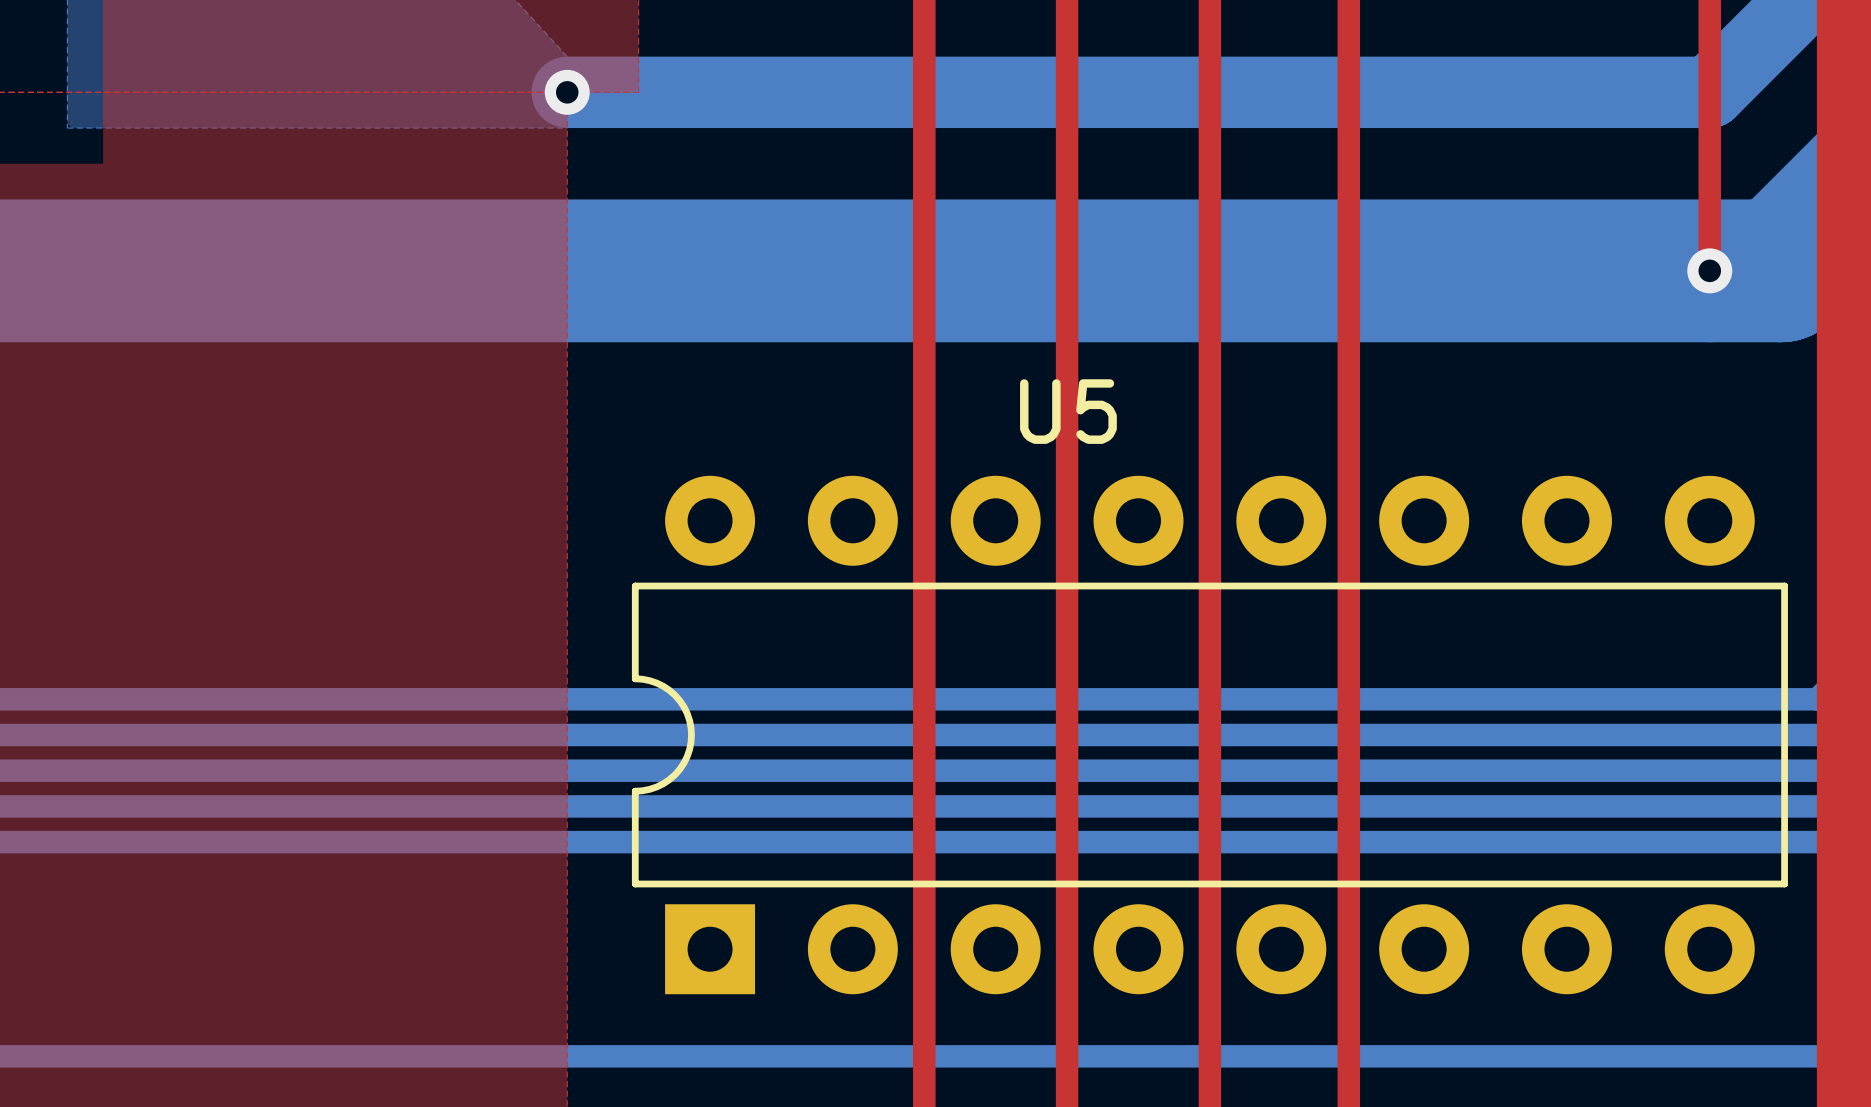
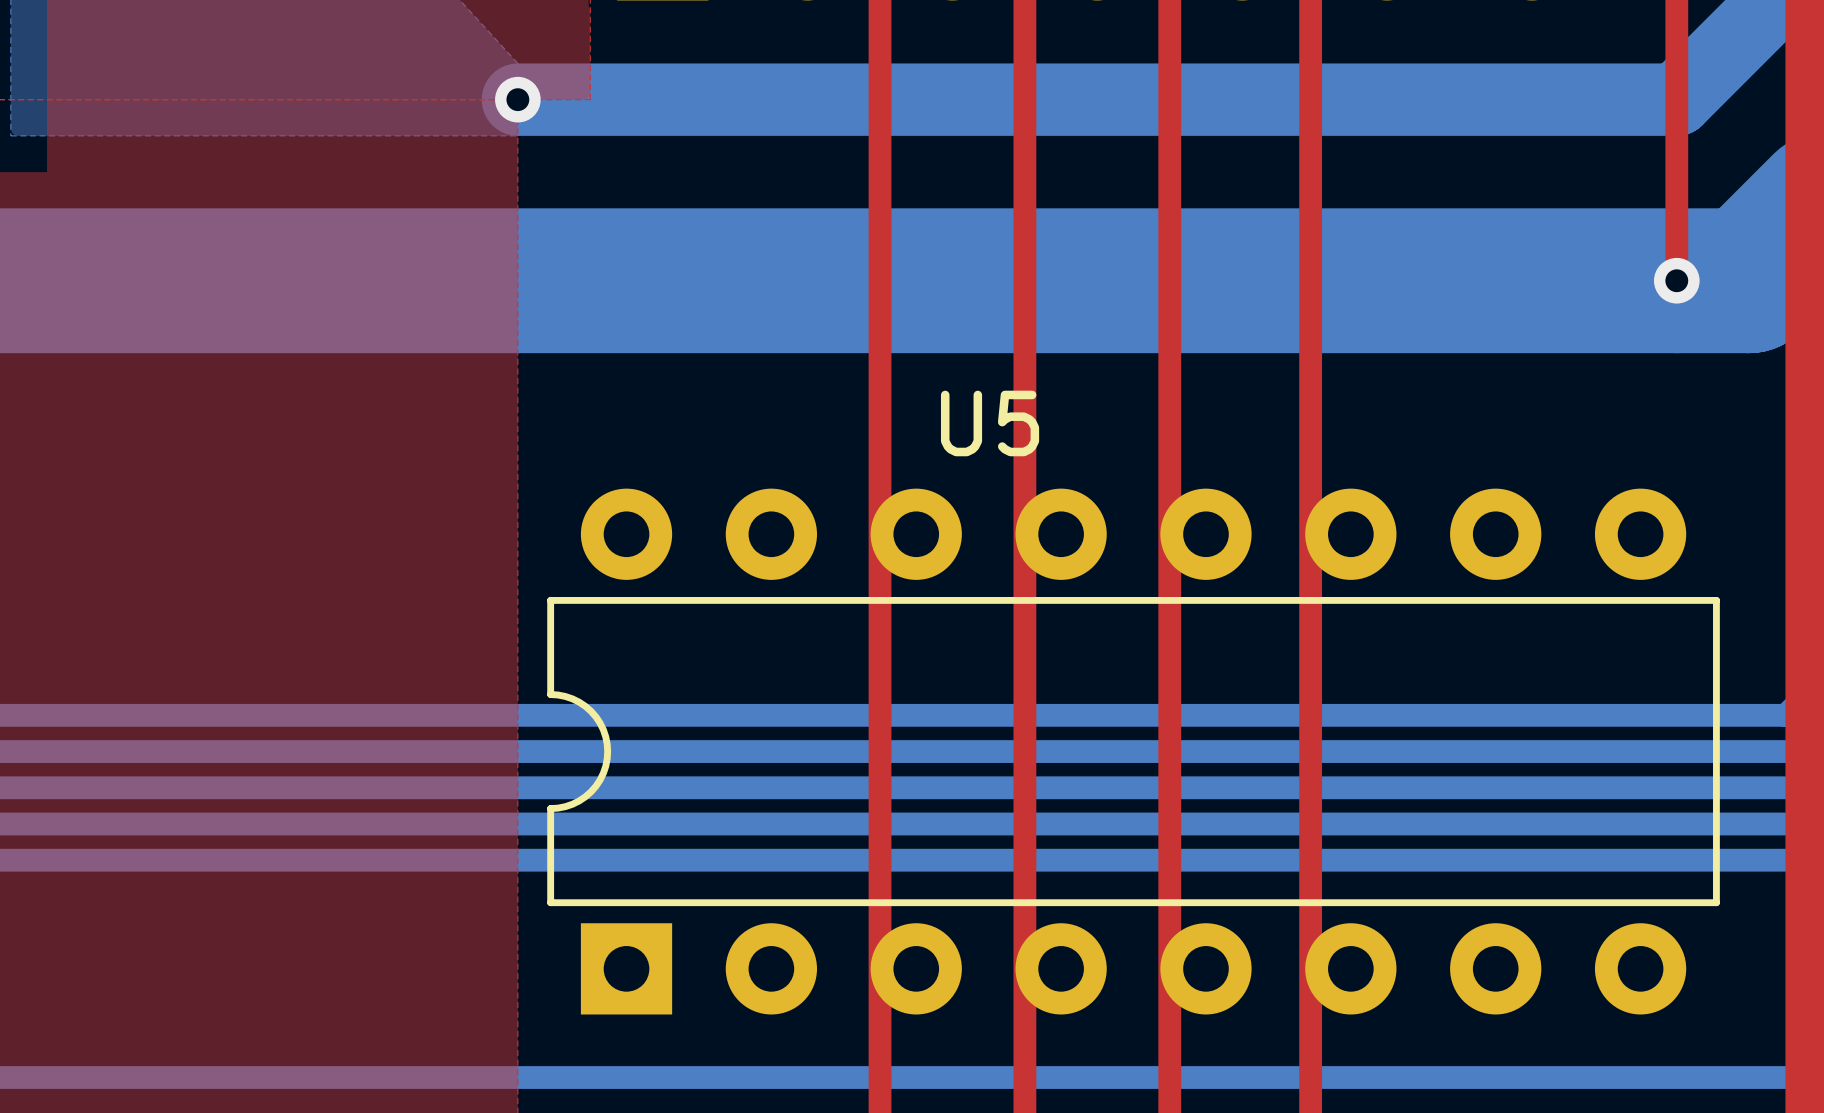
U5 position: (1209, 735) -> (1133, 751)

